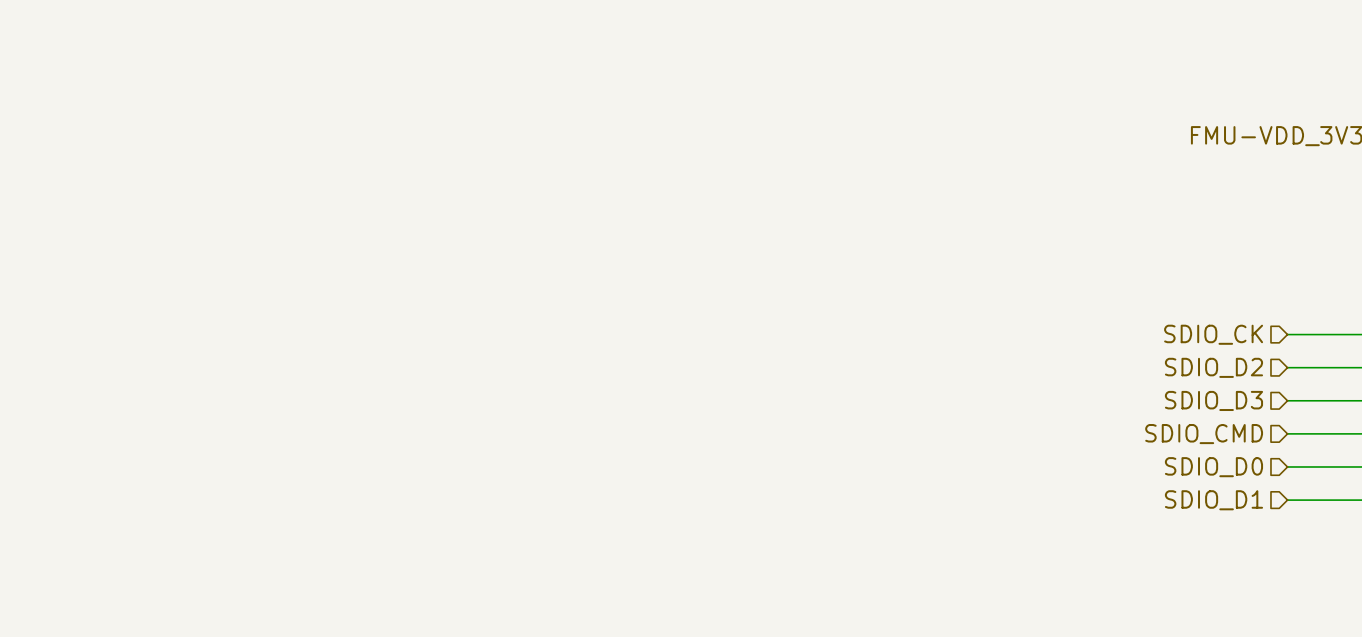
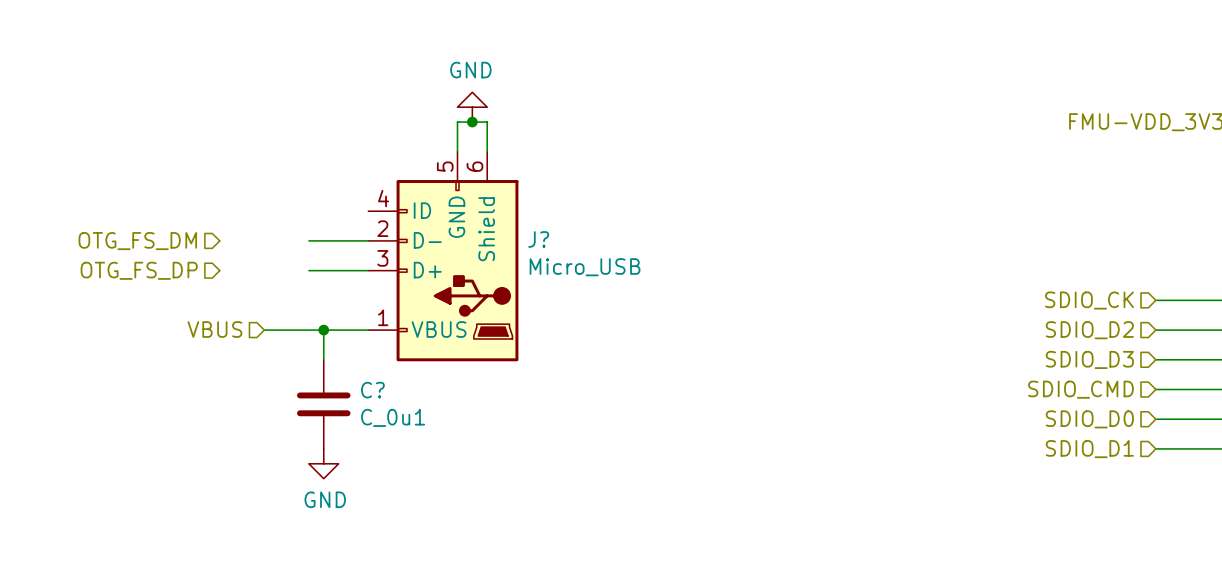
power symbol: none -> GND (472, 107)
junction: none -> (472, 122)
wire: none -> (457, 151) (457, 122) (487, 122) (487, 151)
hierarchical label: none -> OTG_FS_DM (137, 241)
wire: none -> (308, 240) (368, 240)
J?: none -> Micro_USB (443, 256)
hierarchical label: none -> OTG_FS_DP (139, 270)
wire: none -> (308, 270) (368, 270)
hierarchical label: none -> VBUS (214, 329)
wire: none -> (264, 330) (368, 330)
wire: none -> (323, 330) (323, 359)
junction: none -> (323, 330)
C?: none -> C_0u1 (323, 404)
power symbol: none -> GND (323, 463)

